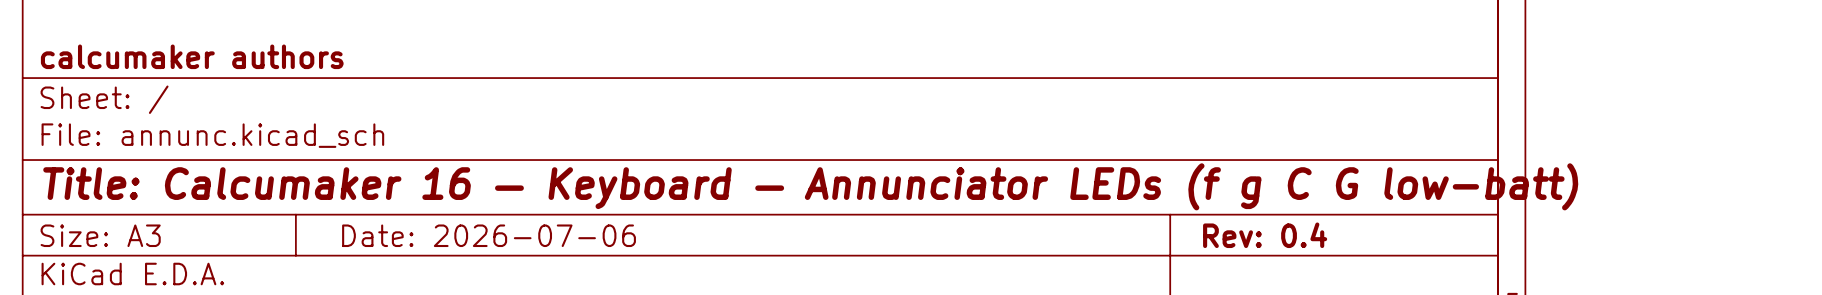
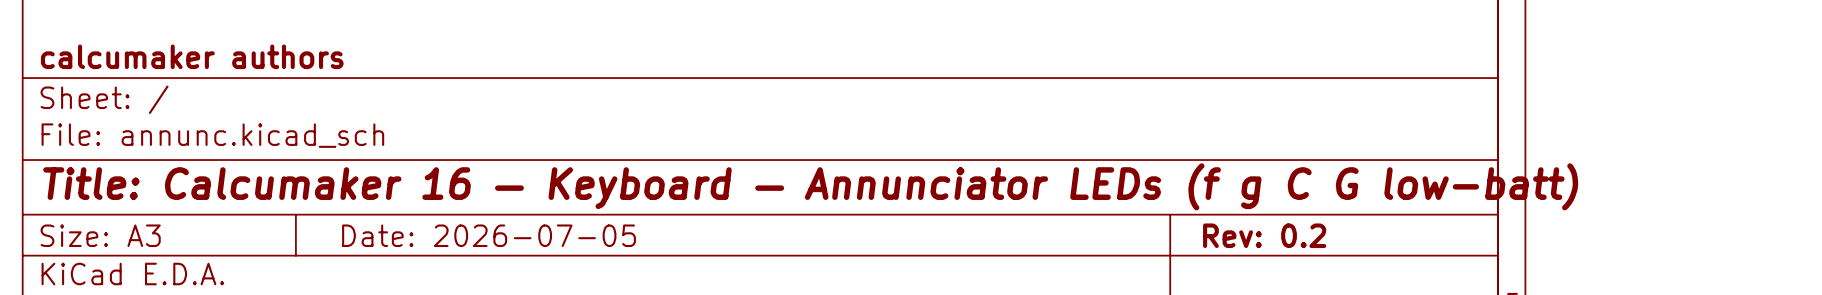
title block: Date: 2026-07-06 (489, 235) -> Date: 2026-07-05 (489, 235)
title block: Rev: 0.4 (1265, 235) -> Rev: 0.2 (1264, 235)

